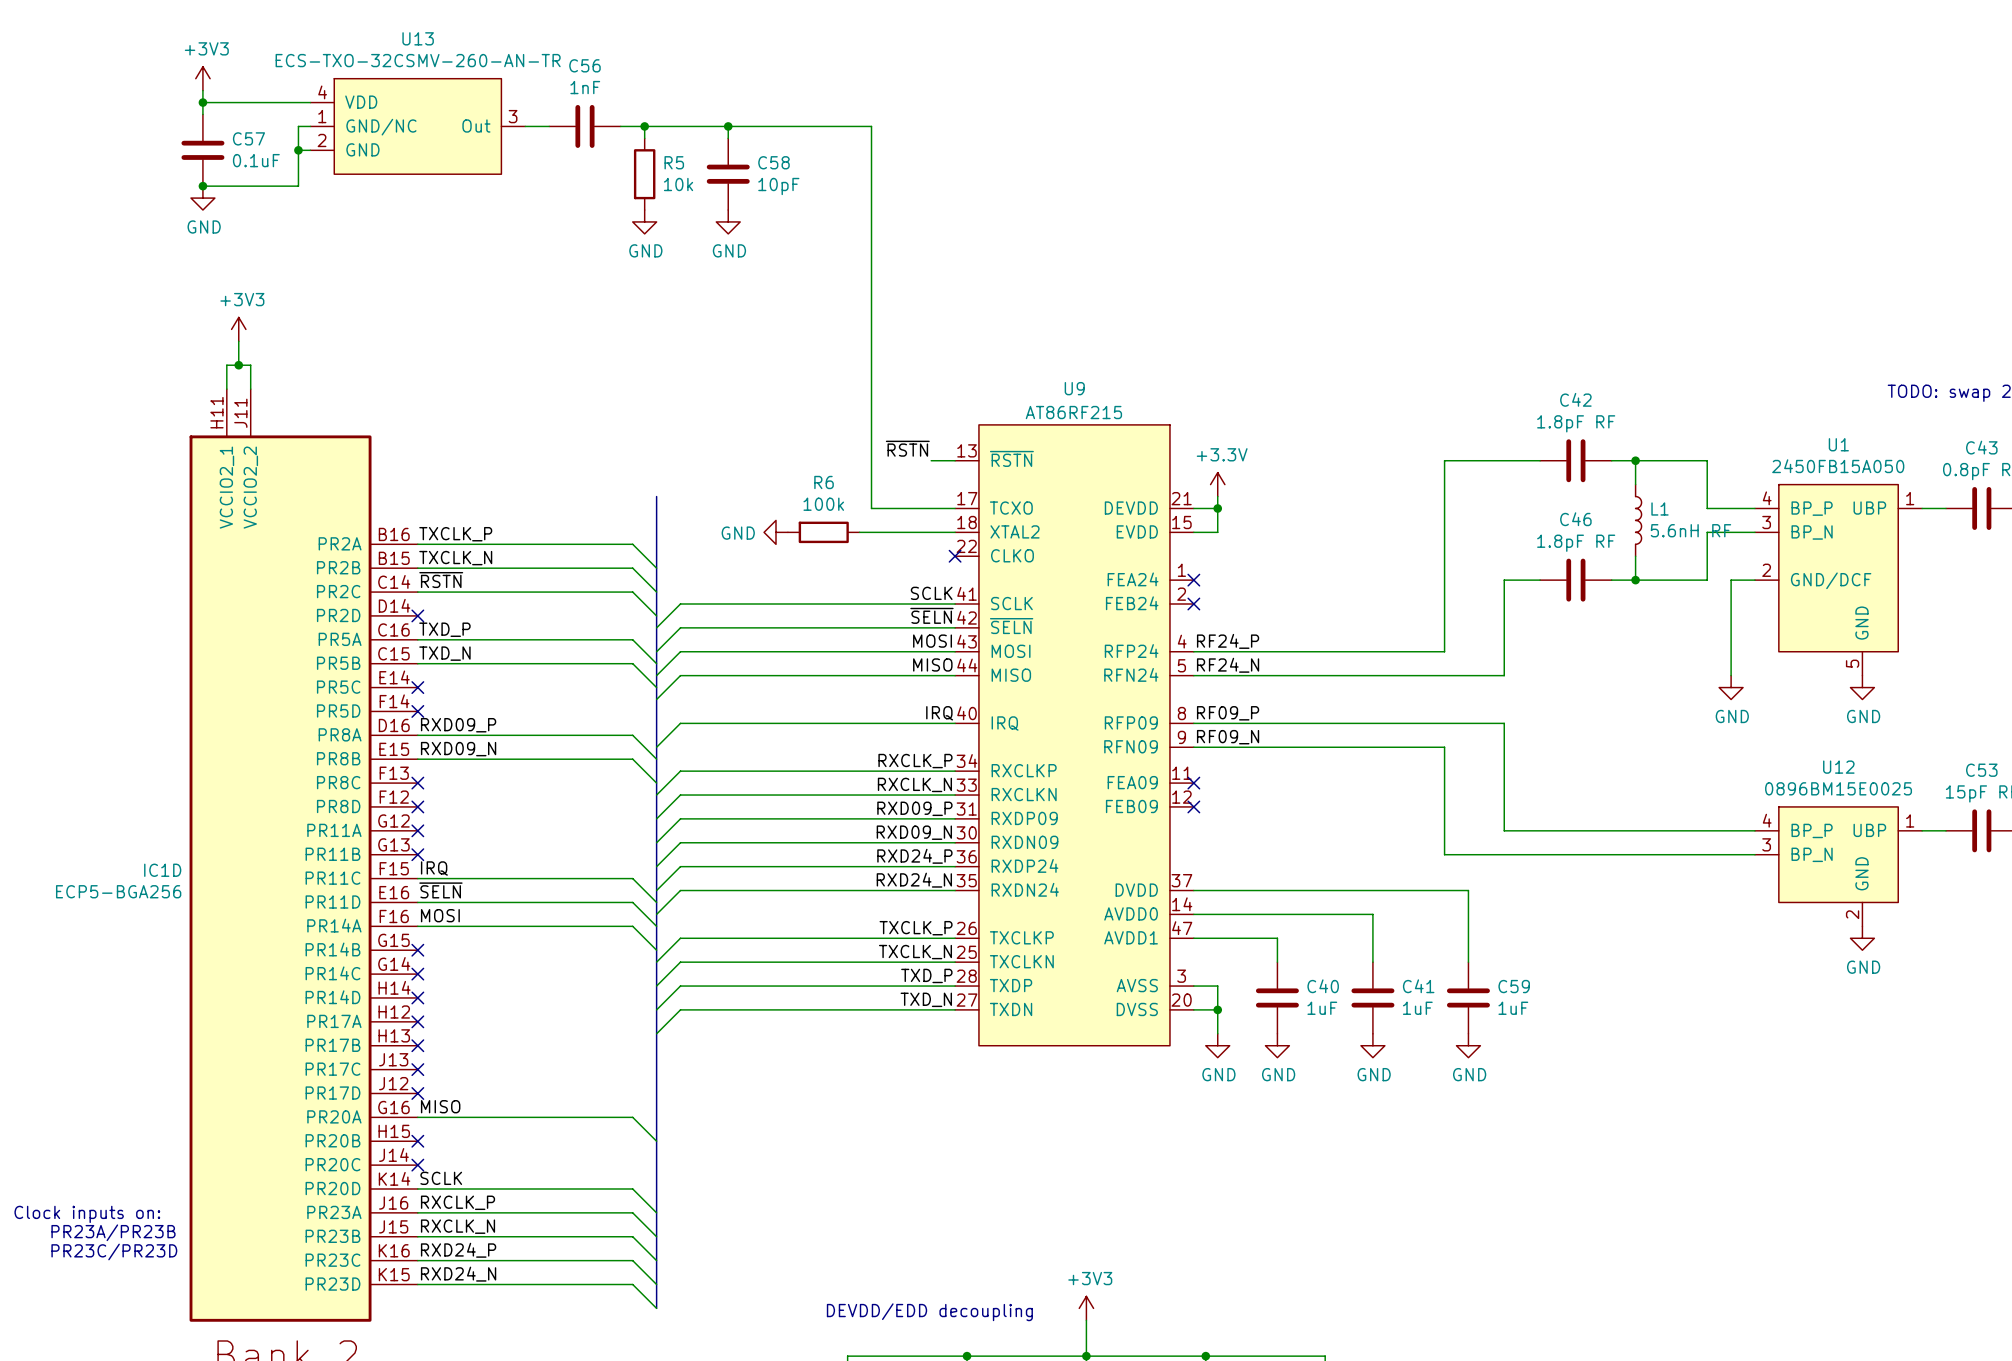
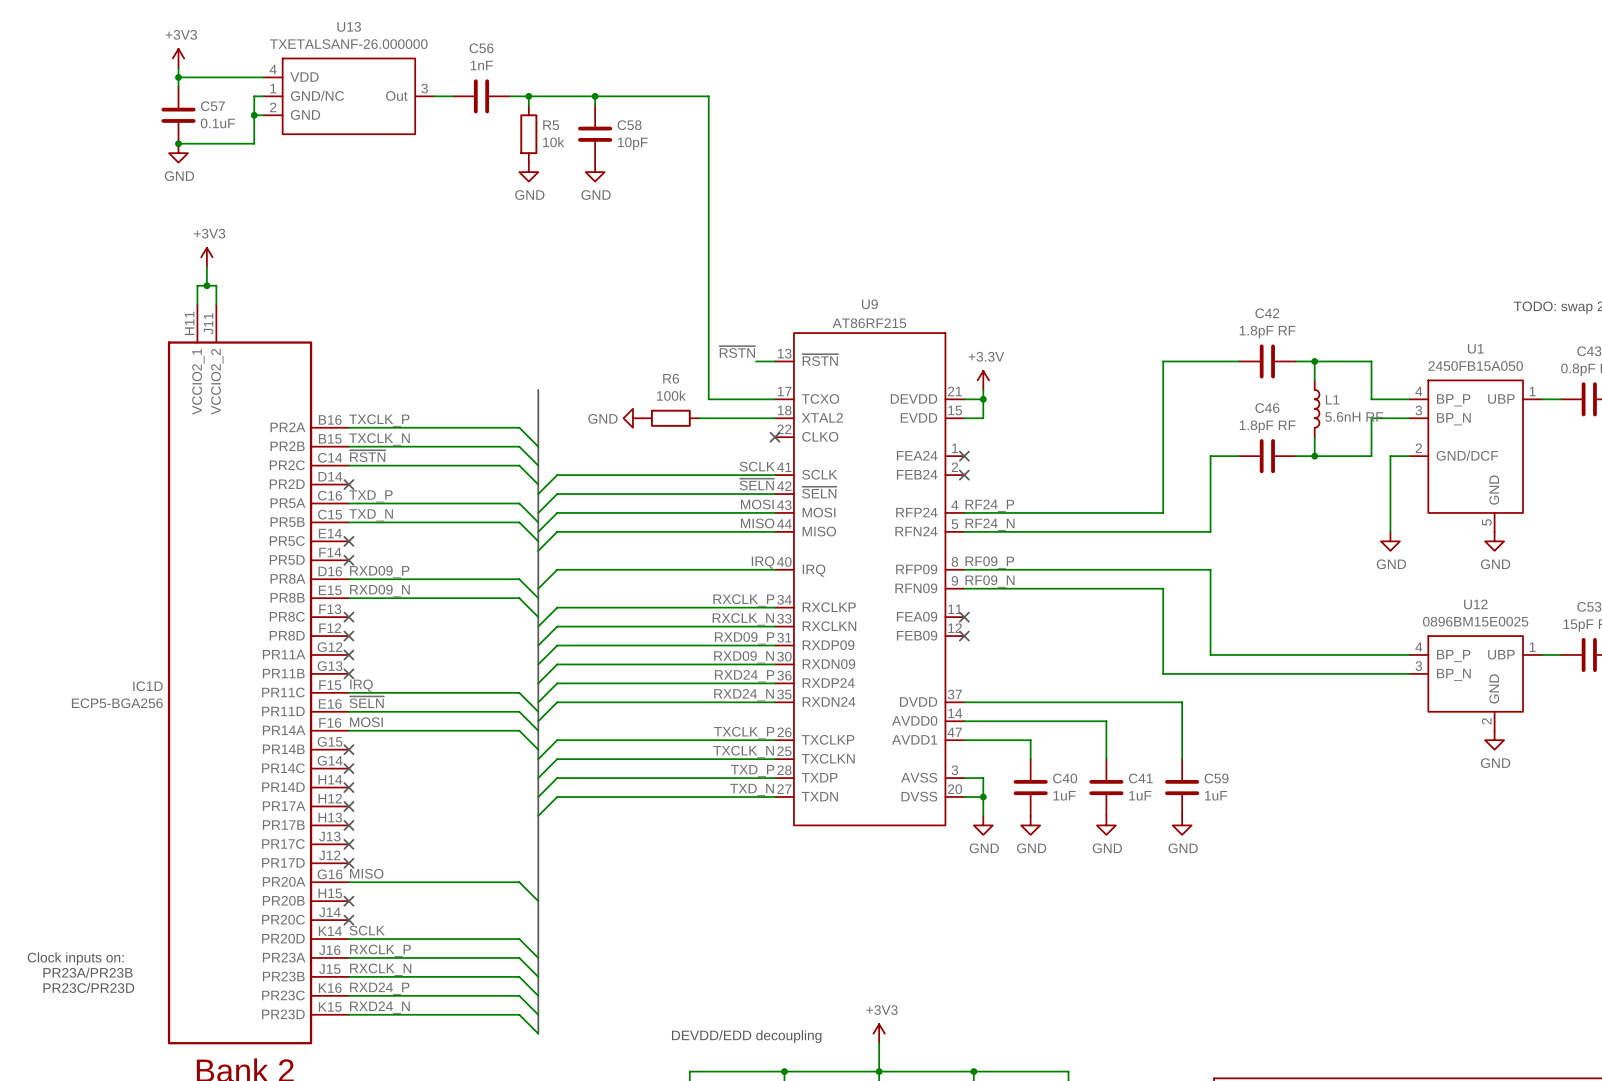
U13 value: ECS-TXO-32CSMV-260-AN-TR (418, 60) -> TXETALSANF-26.000000 (348, 44)

